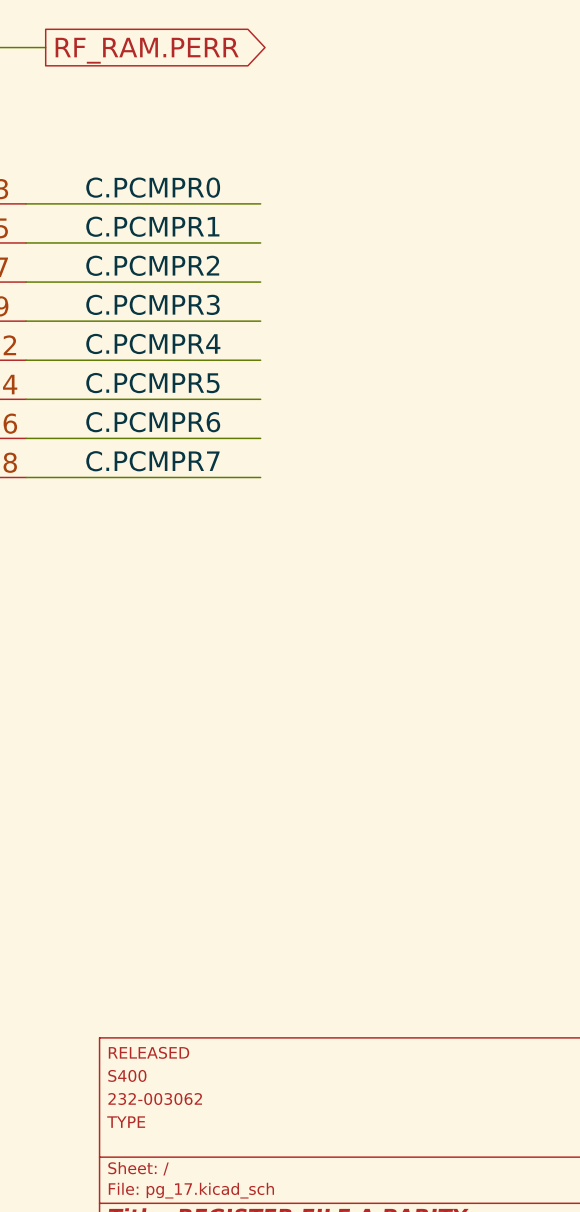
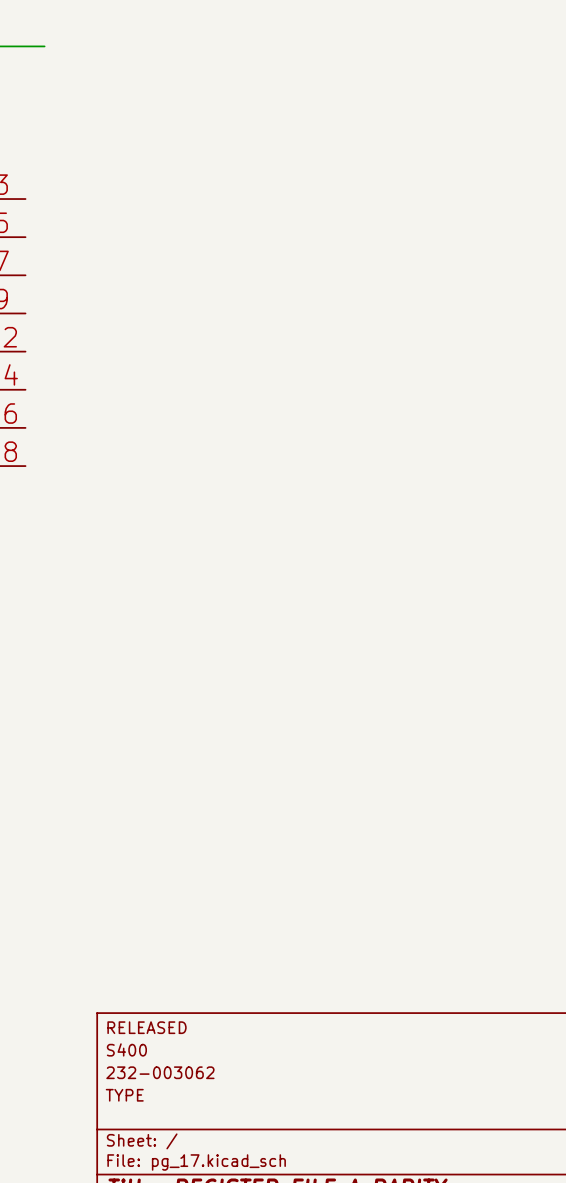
global label: RF_RAM.PERR (147, 50) -> none
label: C.PCMPR0 (153, 187) -> none
wire: (26, 203) (260, 203) -> none
label: C.PCMPR1 (152, 226) -> none
wire: (26, 242) (260, 242) -> none
label: C.PCMPR2 (152, 265) -> none
wire: (26, 282) (260, 282) -> none
label: C.PCMPR3 (153, 304) -> none
wire: (26, 321) (260, 321) -> none
label: C.PCMPR4 (153, 343) -> none
wire: (26, 360) (260, 360) -> none
label: C.PCMPR5 (152, 383) -> none
wire: (26, 399) (260, 399) -> none
label: C.PCMPR6 (153, 422) -> none
wire: (26, 438) (260, 438) -> none
label: C.PCMPR7 (152, 461) -> none
wire: (26, 477) (260, 477) -> none

